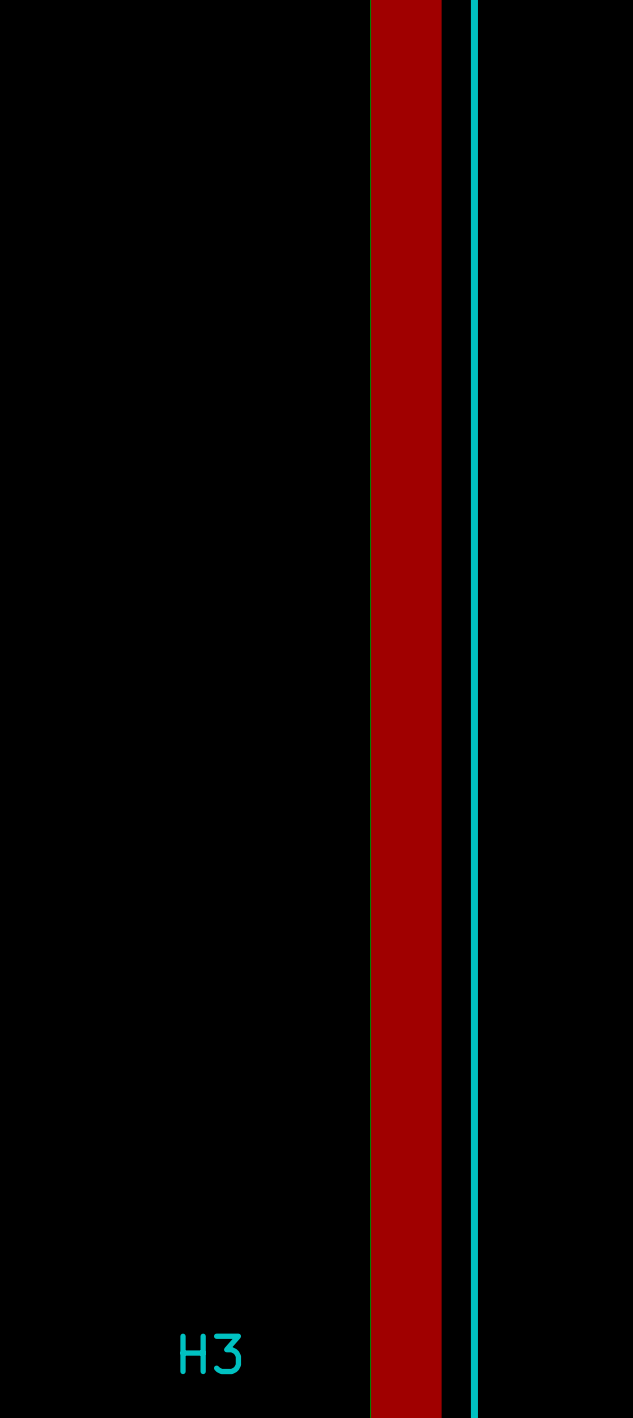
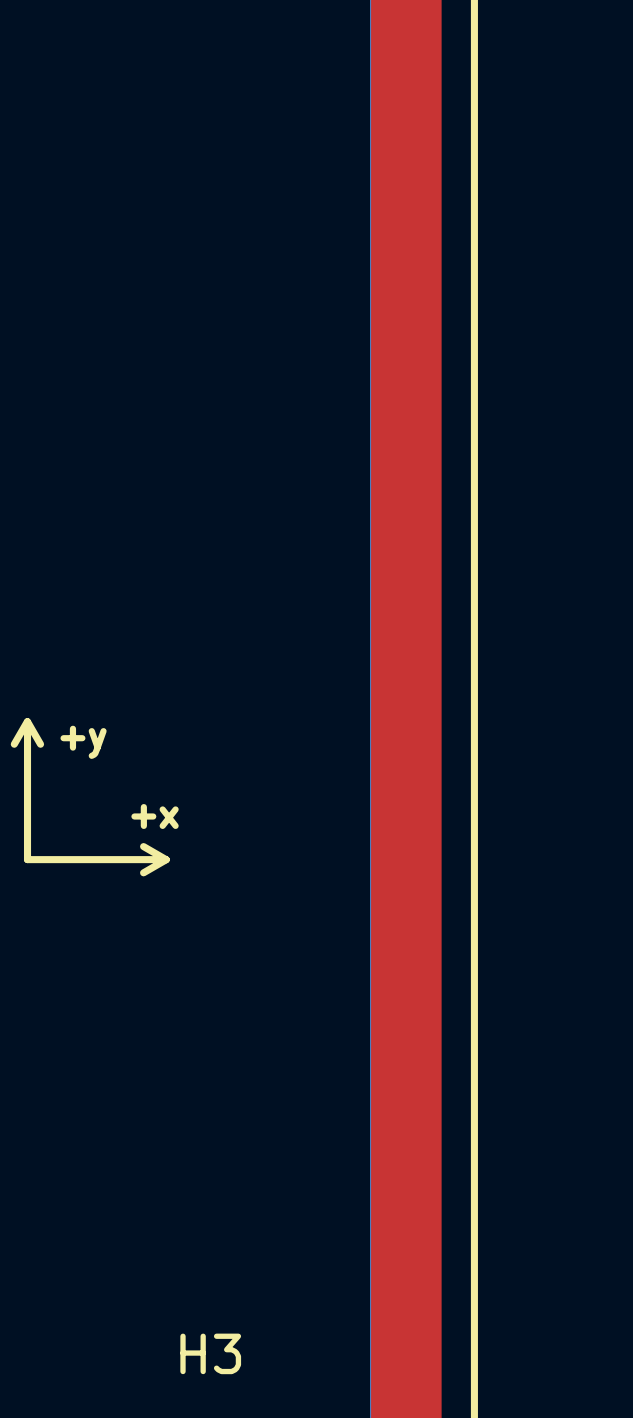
line: none -> (27, 722) (27, 859) (166, 859)
text: none -> +y (83, 742)
line: none -> (14, 744) (27, 721) (40, 744)
text: none -> +x (155, 816)
line: none -> (143, 846) (166, 859)
line: none -> (166, 859) (143, 872)

